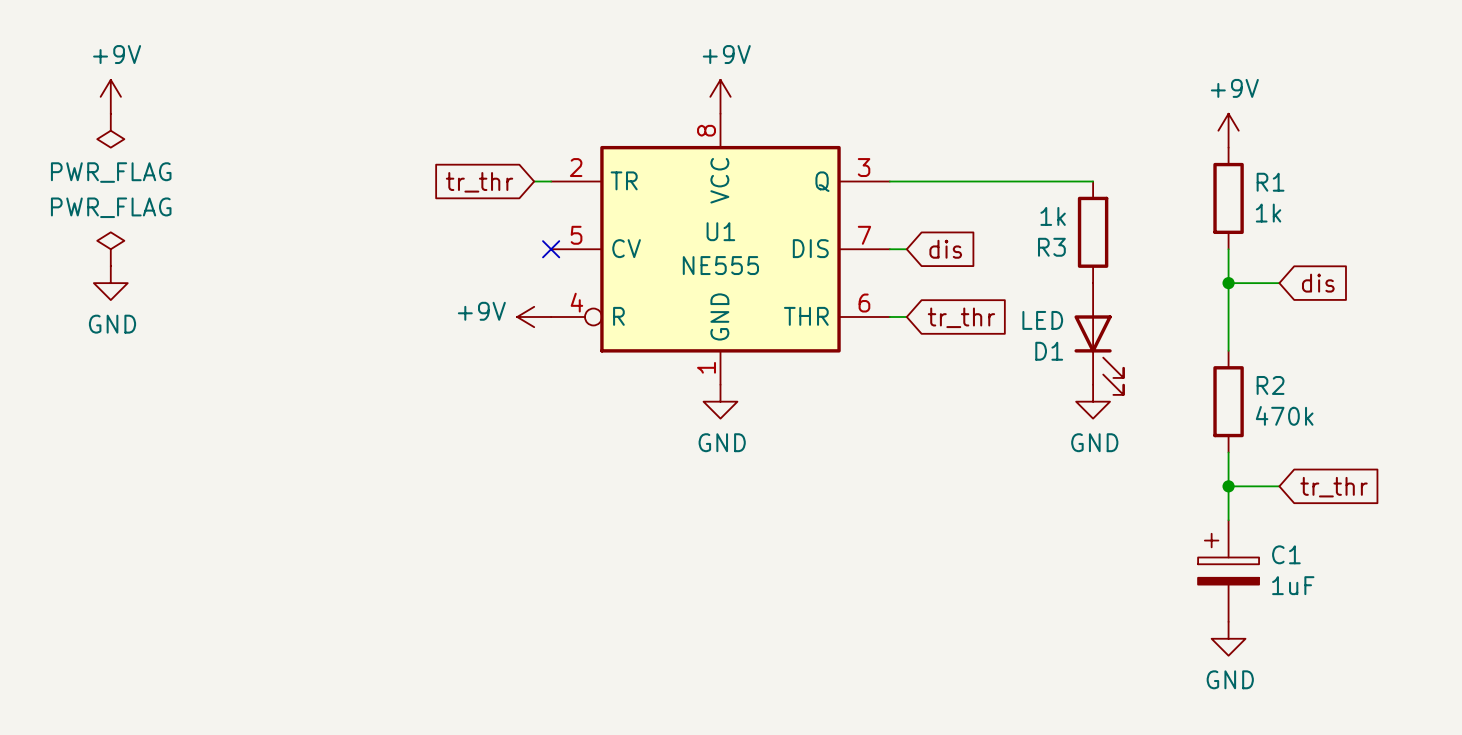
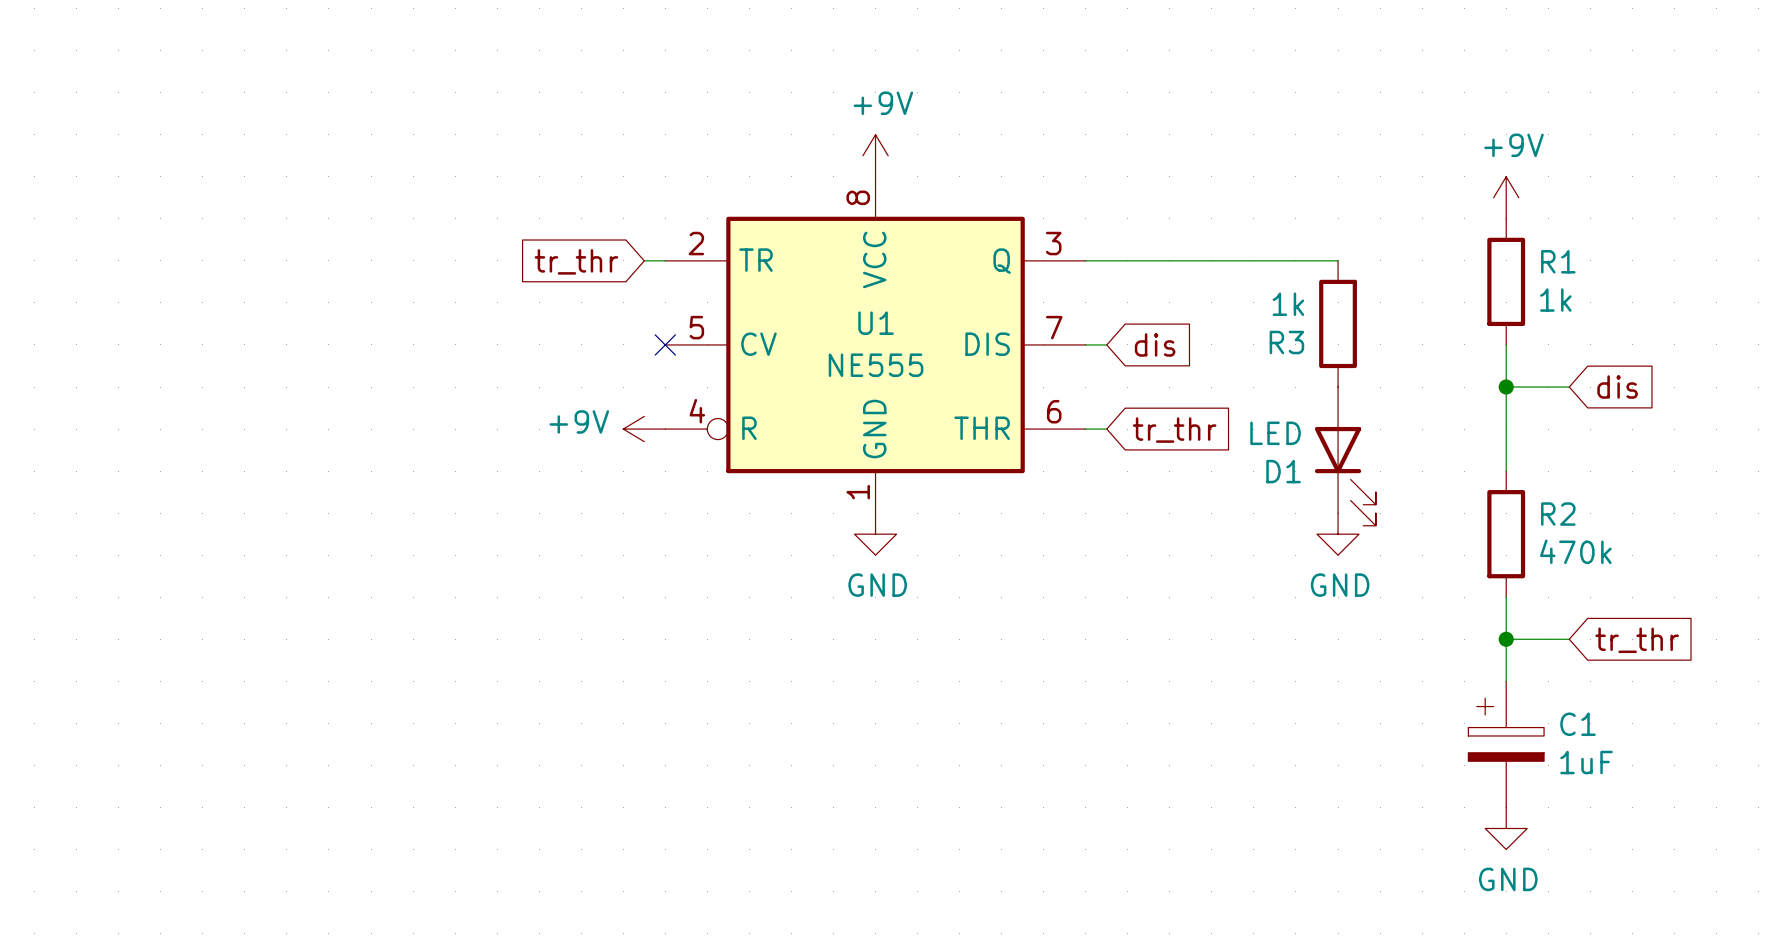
power symbol: +9V (110, 96) -> none
power symbol: PWR_FLAG (110, 130) -> none
power symbol: PWR_FLAG (110, 249) -> none
power symbol: GND (110, 283) -> none

